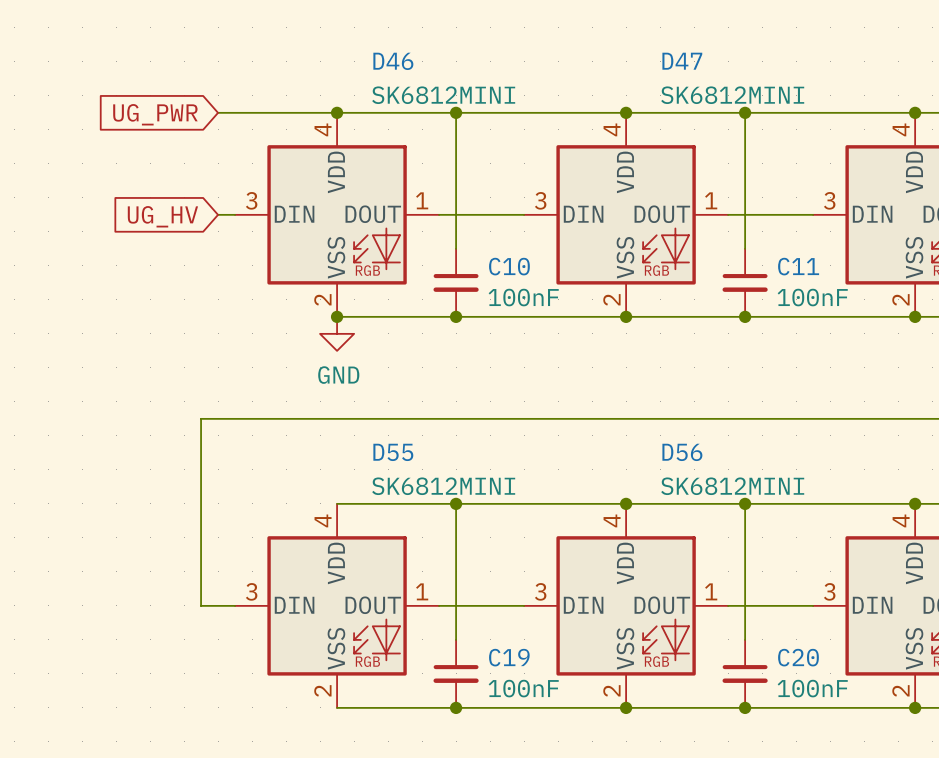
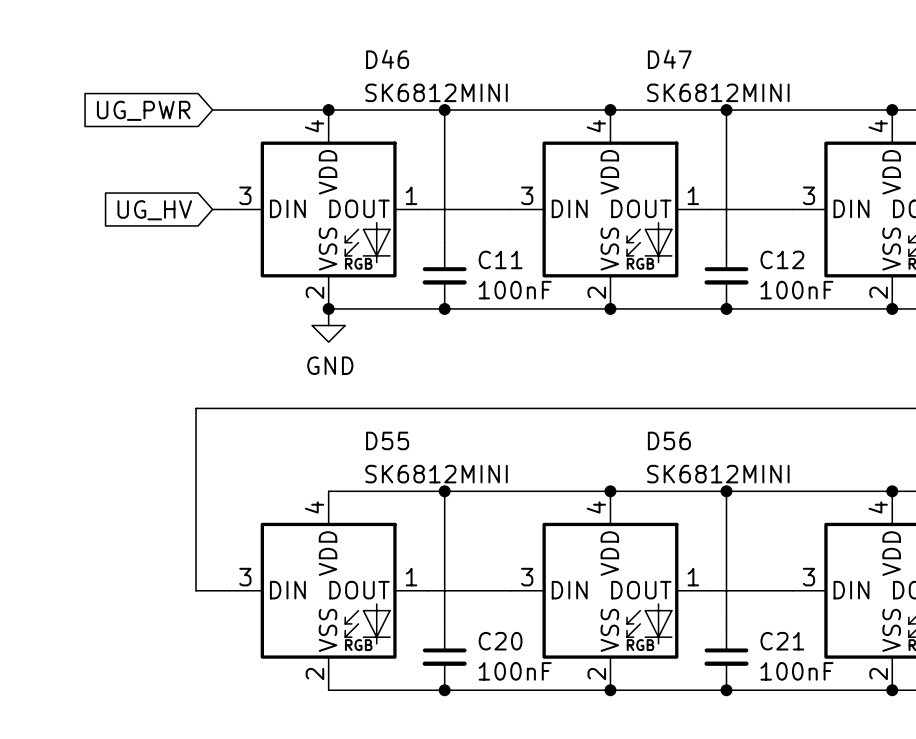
C10 name: C10 (509, 266) -> C11 (500, 259)
C11 name: C11 (798, 266) -> C12 (782, 259)
C19 name: C19 (509, 657) -> C20 (500, 641)
C20 name: C20 (798, 657) -> C21 (782, 641)

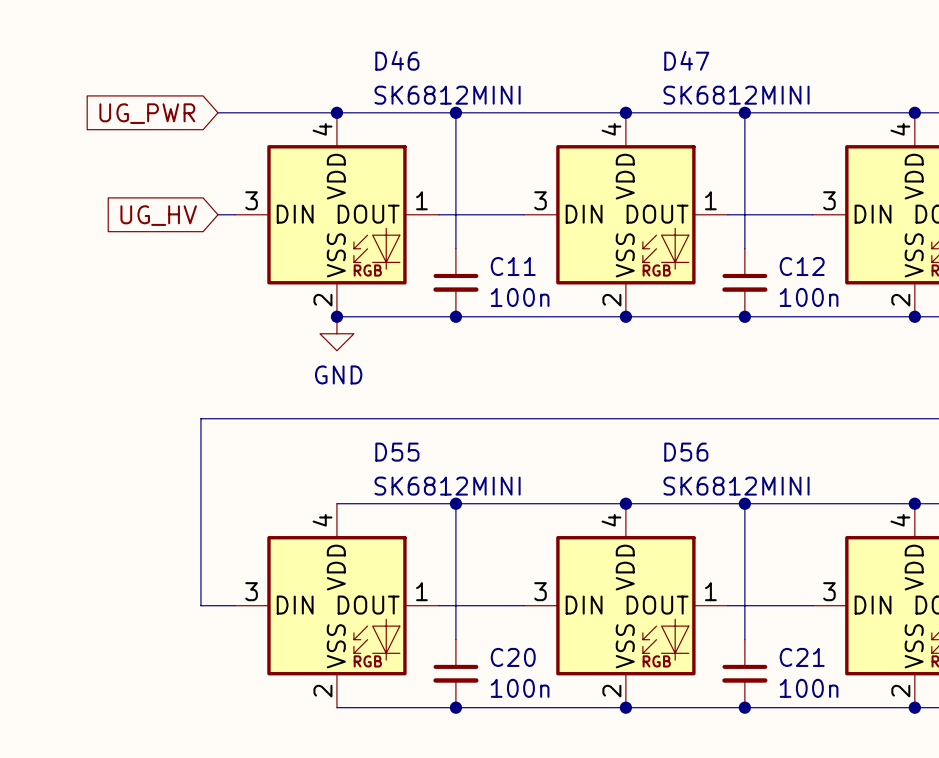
C11 value: 100nF (515, 290) -> 100n (520, 297)
C12 value: 100nF (796, 290) -> 100n (809, 297)
C20 value: 100nF (515, 671) -> 100n (520, 688)
C21 value: 100nF (796, 671) -> 100n (809, 688)

